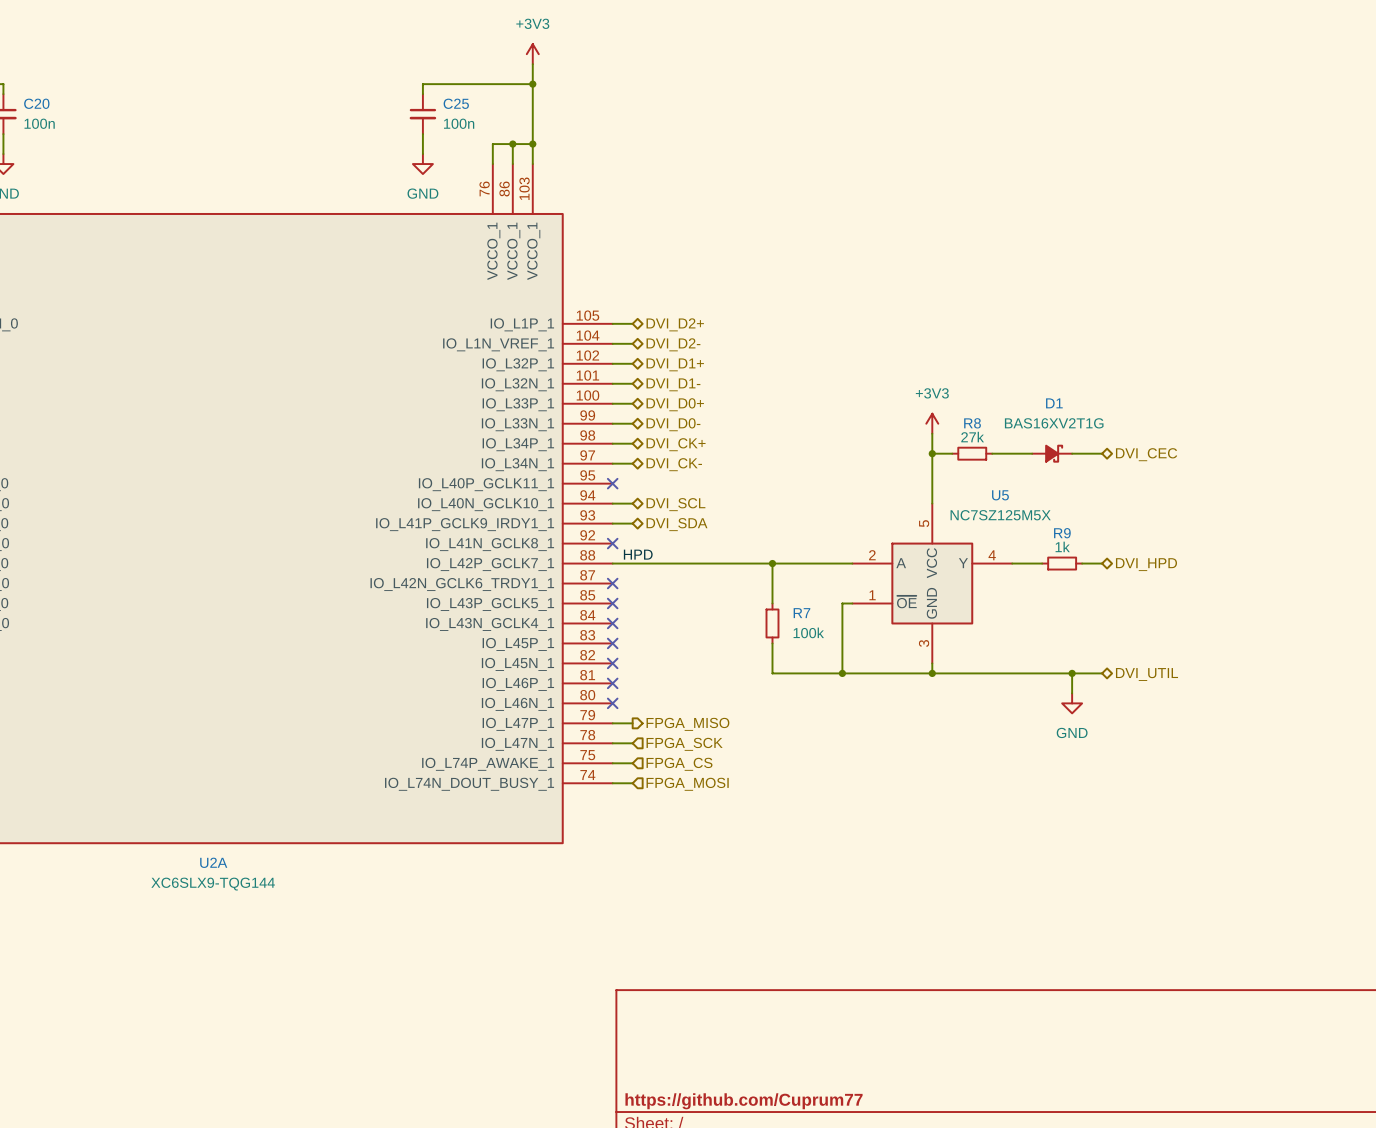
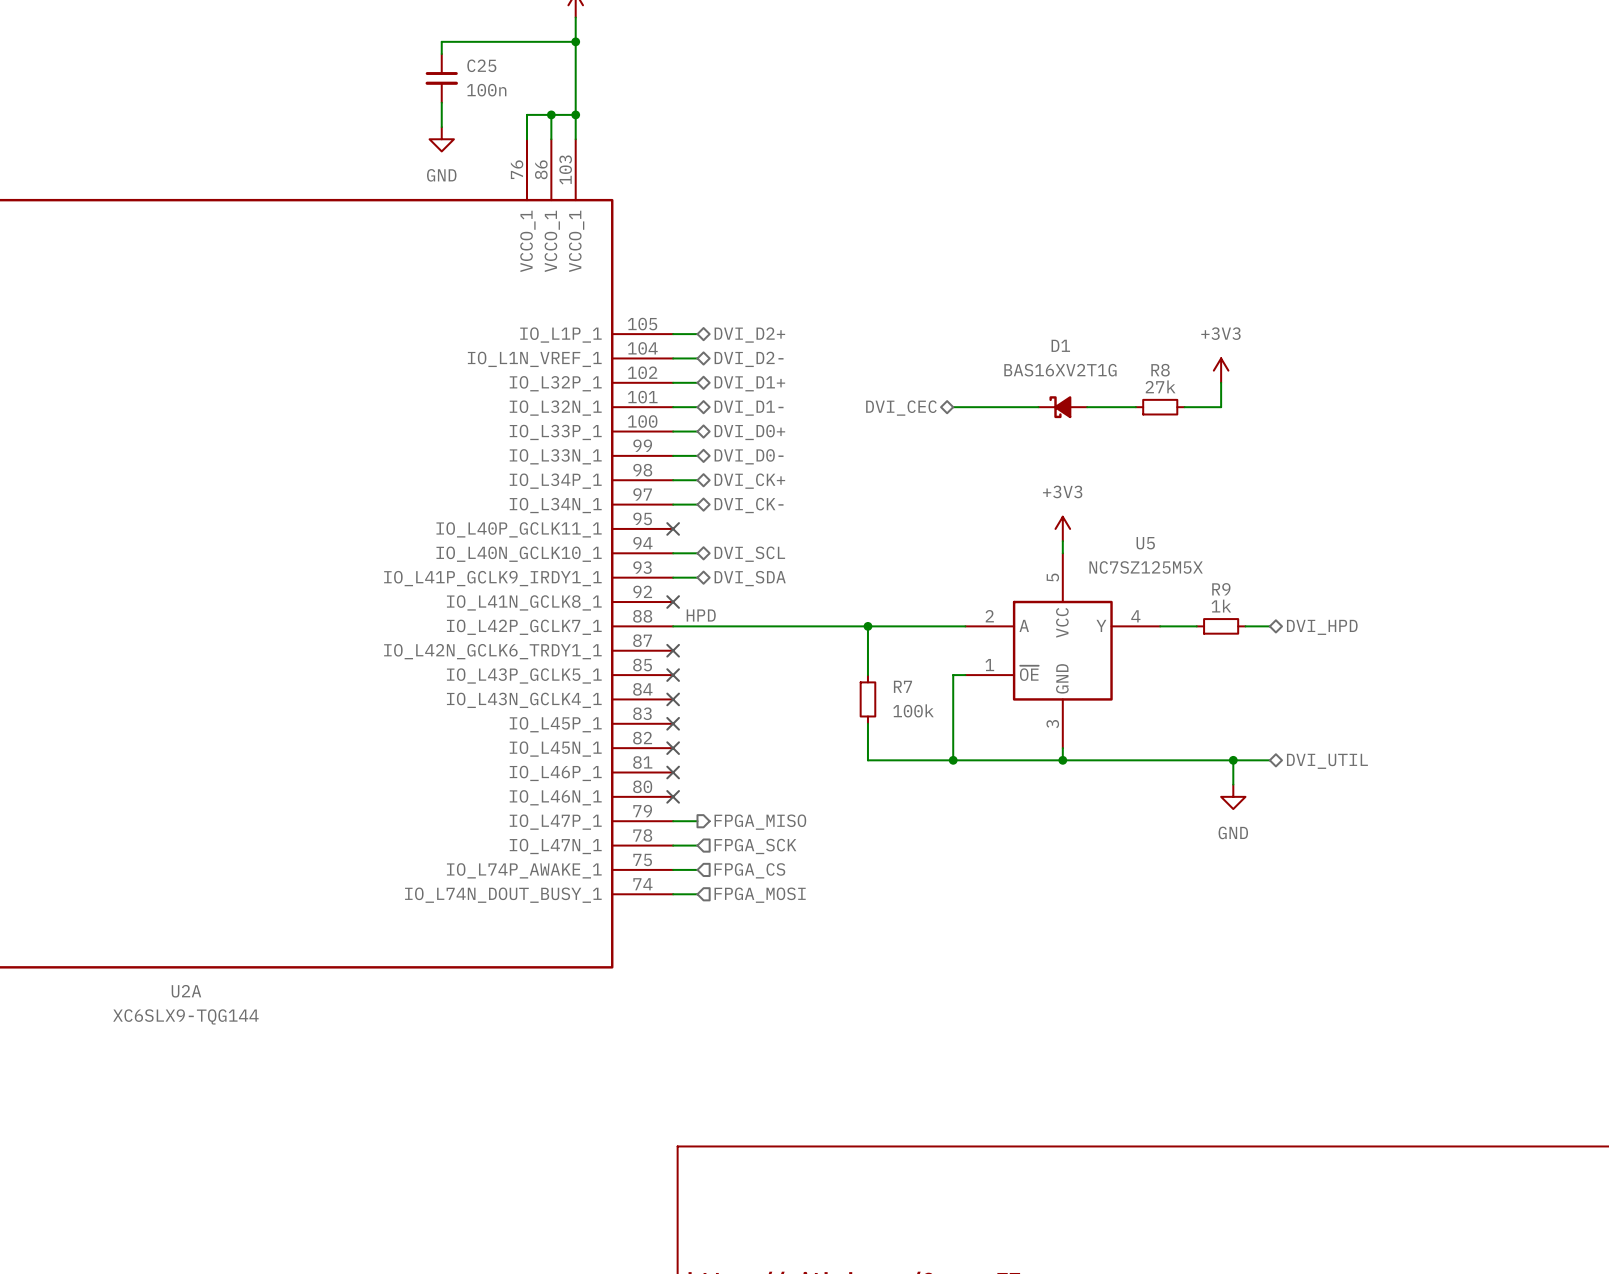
power symbol: none -> +3V3 (1221, 370)
wire: none -> (1221, 382) (1221, 407) (1184, 407)
wire: none -> (953, 407) (1038, 407)
hierarchical label: none -> DVI_CEC (901, 408)
power symbol position: +3V3 (932, 423) -> +3V3 (1062, 528)
wire: (932, 433) (932, 493) -> none
wire: (932, 453) (952, 453) -> none
junction: (932, 453) -> none
R8 position: (972, 453) -> (1160, 407)
wire: (992, 453) (1032, 453) -> (1087, 407) (1135, 407)
D1 position: (1052, 453) -> (1062, 407)
D1 flip: as is (1054, 453) -> left-right (1060, 407)
wire: (1072, 453) (1102, 453) -> none
hierarchical label: DVI_CEC (1146, 454) -> none

